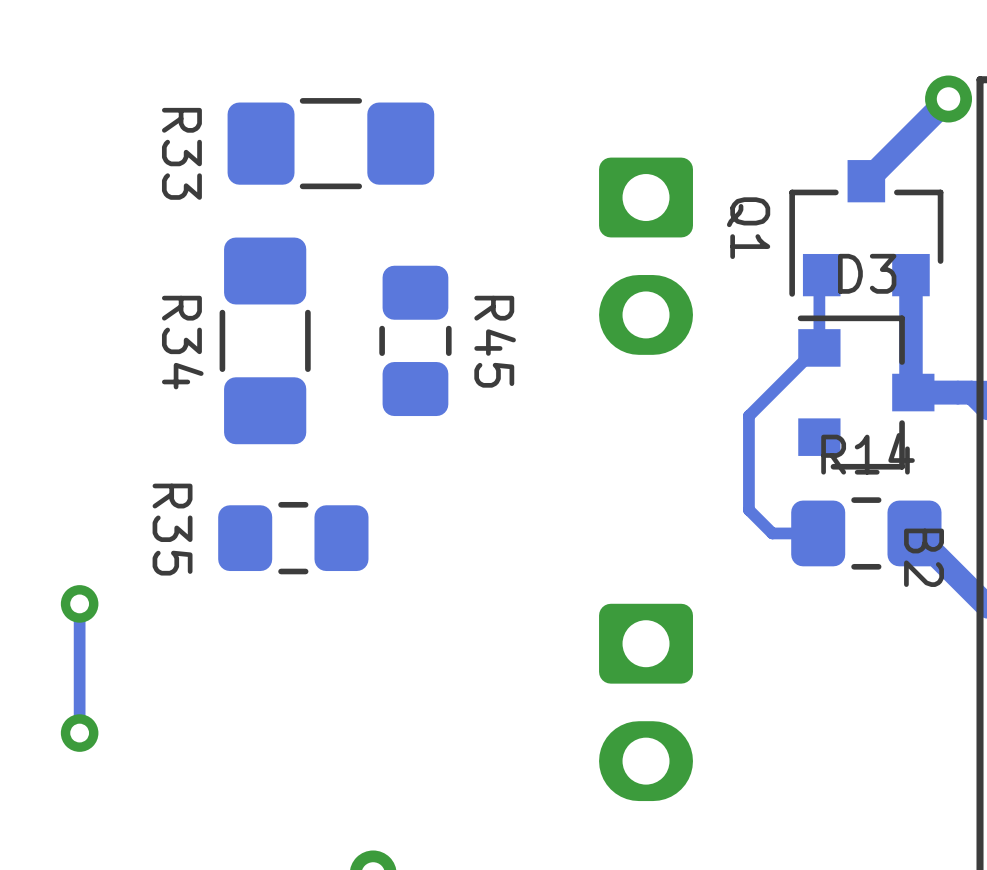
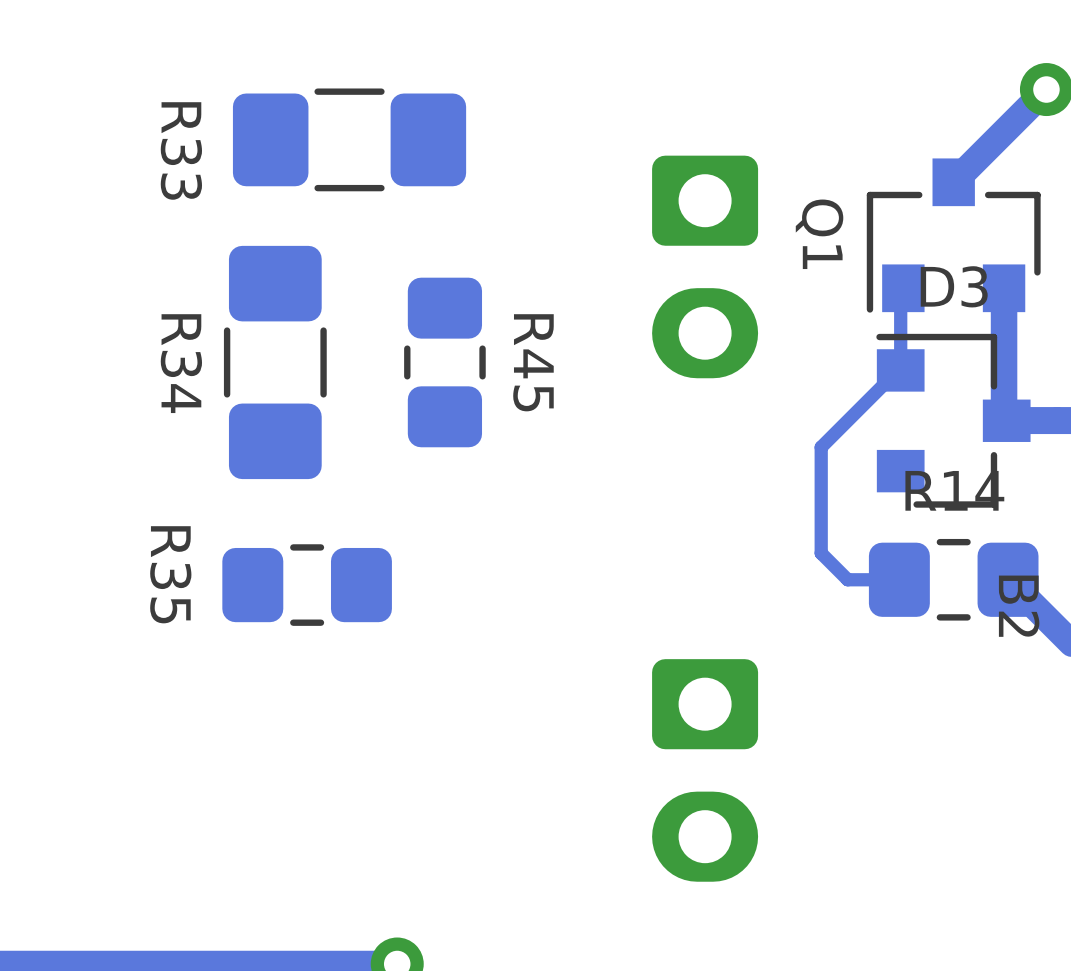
track: (79, 603) (79, 733) -> none
via: (79, 603) -> none
via: (79, 733) -> none

